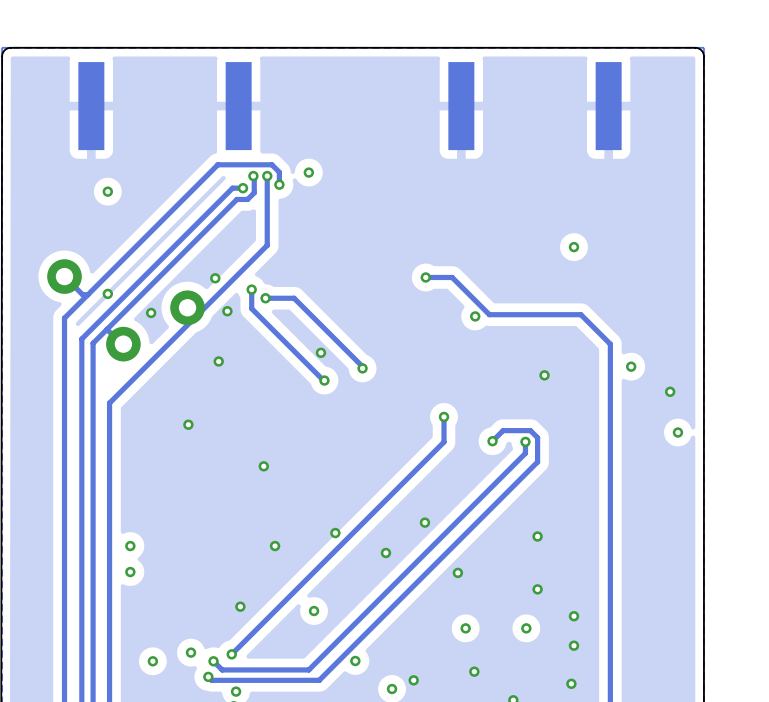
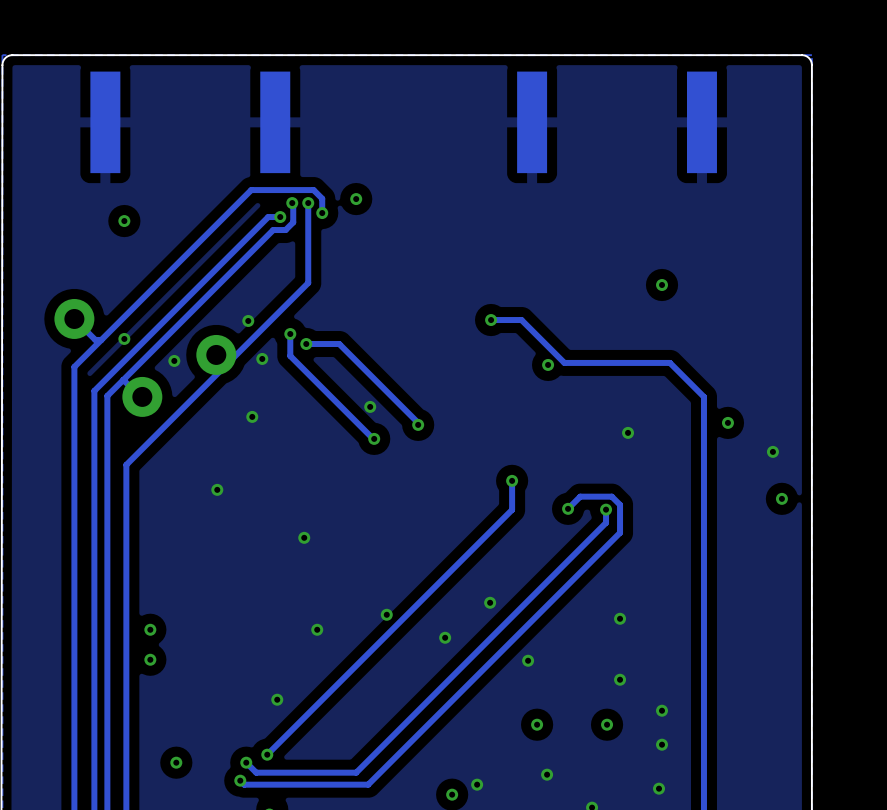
via: (314, 611) -> none
via: (191, 652) -> none
via: (355, 660) -> none
via: (236, 691) -> none

